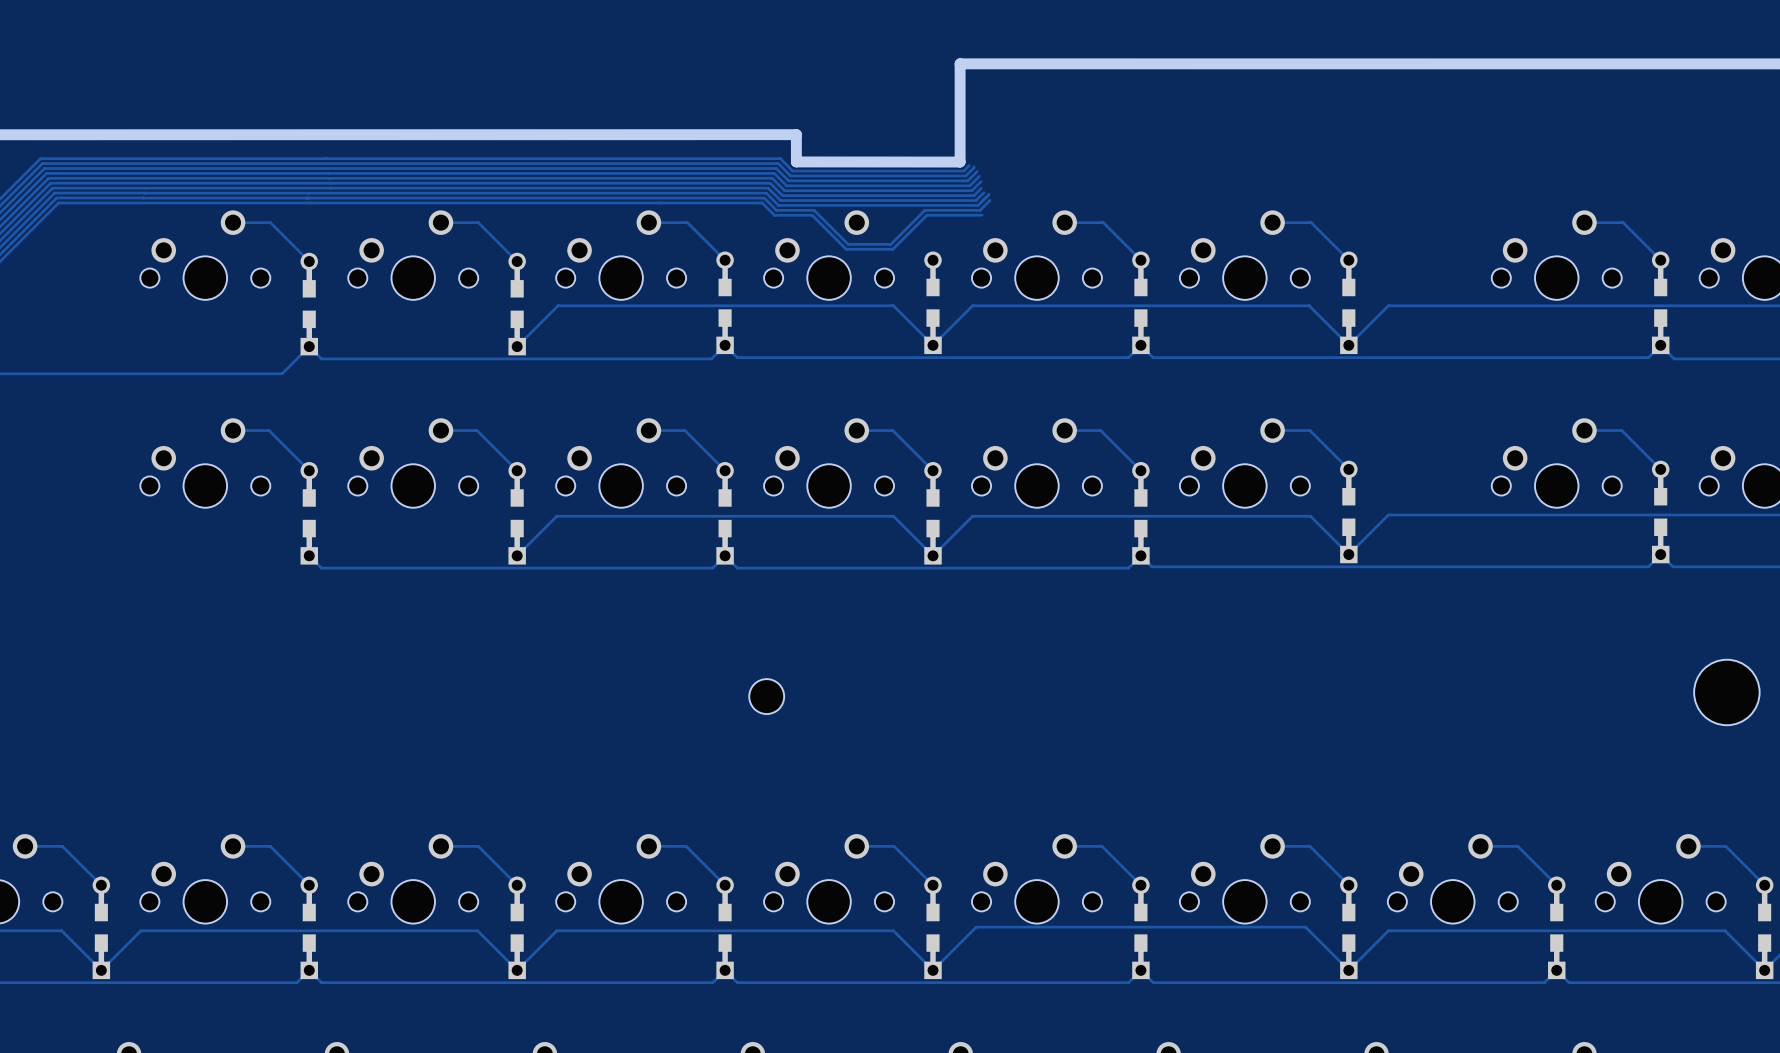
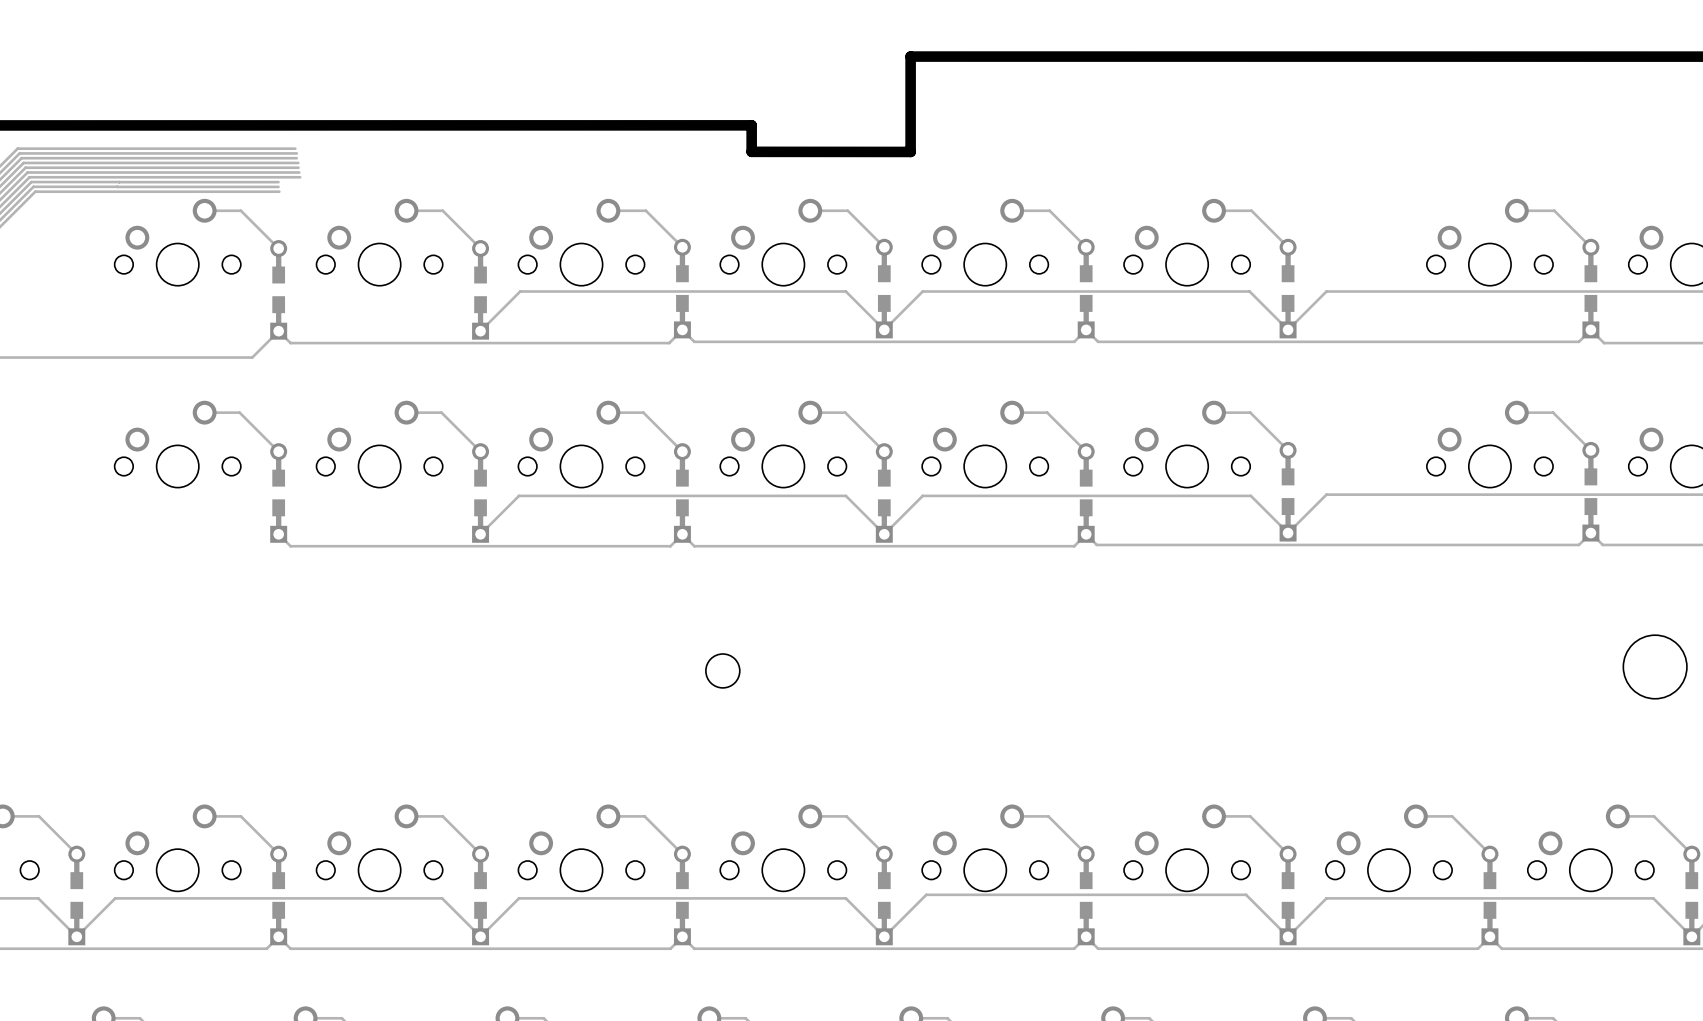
track: (326, 158) (780, 158) (792, 171) (963, 171) (969, 165) -> none
track: (327, 163) (778, 163) (790, 175) (965, 175) (974, 166) -> none
track: (327, 168) (776, 168) (788, 180) (967, 180) (977, 171) -> none
track: (329, 173) (774, 173) (786, 185) (969, 185) (979, 176) -> none
track: (329, 178) (772, 178) (784, 190) (971, 190) (981, 181) -> none
track: (330, 183) (770, 183) (782, 195) (974, 195) (981, 188) -> none
track: (331, 188) (768, 188) (780, 200) (976, 200) (983, 192) -> none
track: (309, 193) (766, 193) (778, 205) (978, 205) (988, 194) -> none
track: (309, 198) (764, 198) (776, 210) (814, 210) (848, 244) (890, 244) (924, 210) (980, 210) (990, 200) -> none
track: (309, 202) (762, 202) (774, 215) (812, 215) (846, 249) (892, 249) (926, 215) (982, 215) -> none
track: none -> (810, 210) (847, 210) (884, 247)

